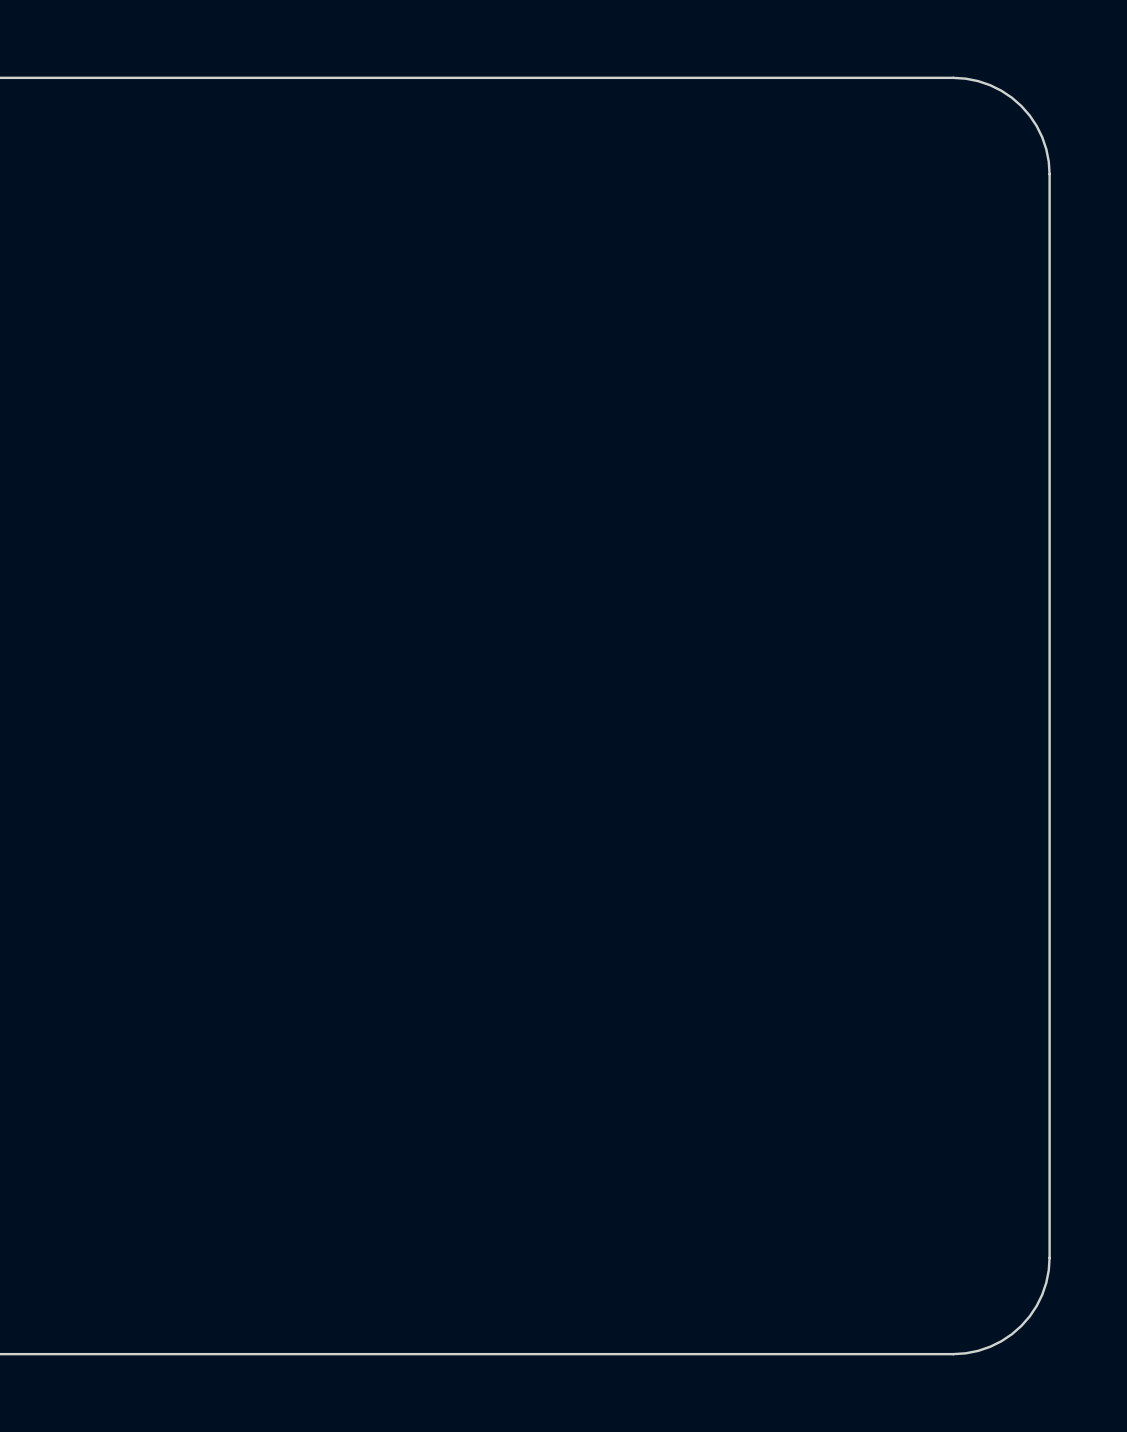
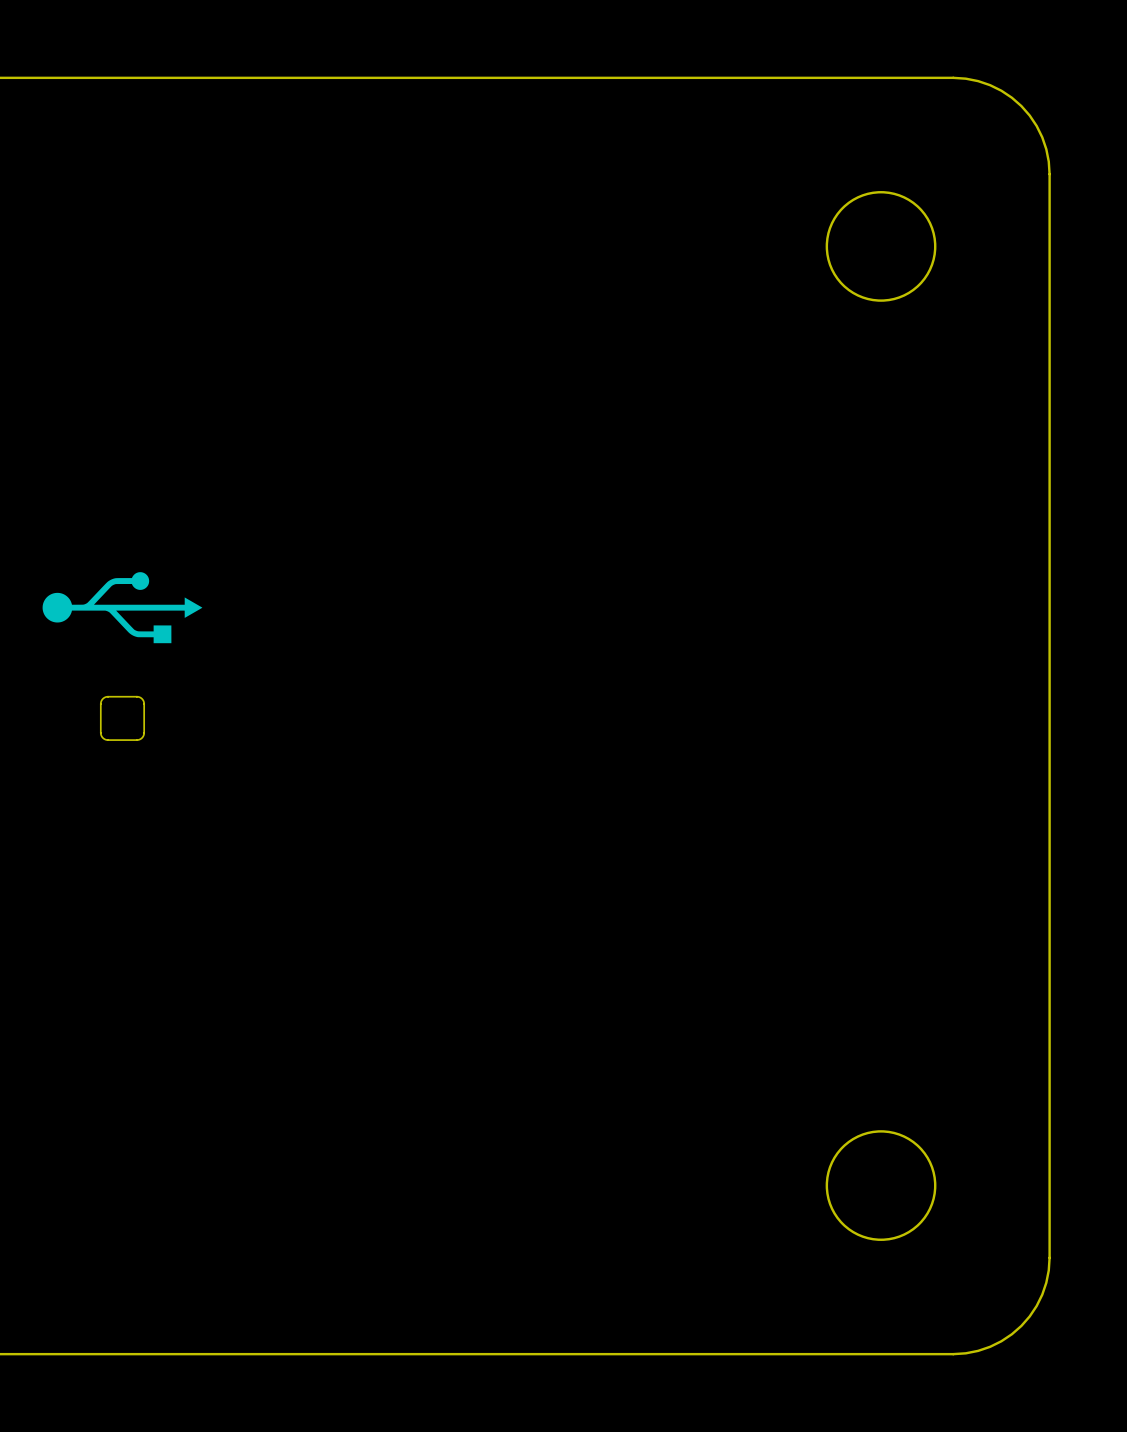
round board edge: none -> [825, 191, 937, 302]
drawing: none -> [42, 572, 203, 644]
part: none -> (122, 718)
round board edge: none -> [825, 1130, 937, 1241]

